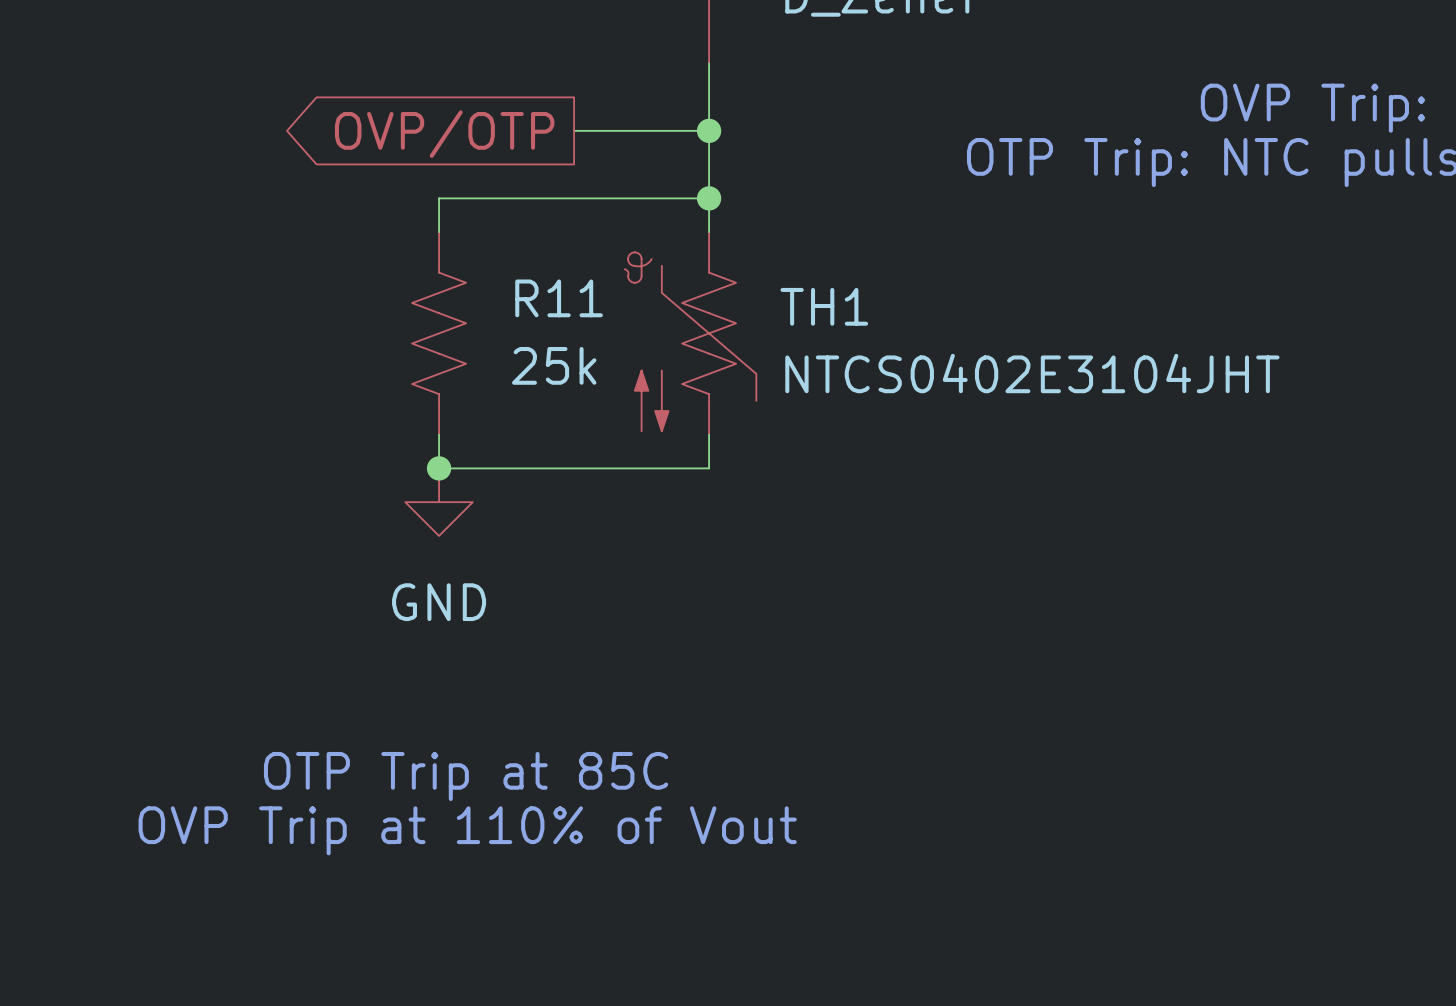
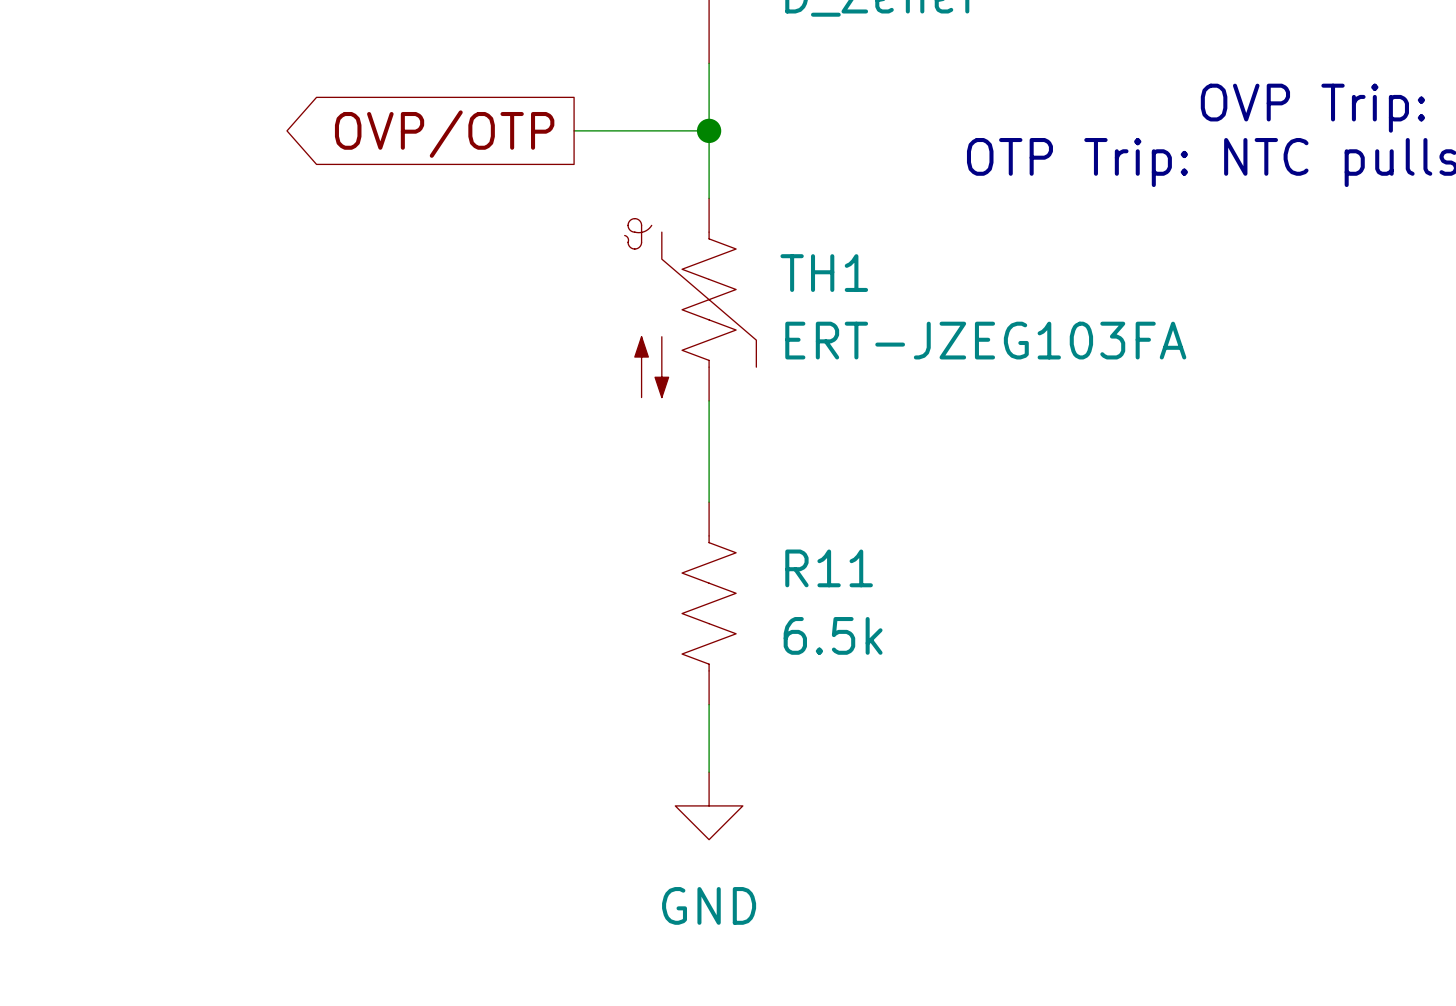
junction: (709, 198) -> none
wire: (439, 232) (439, 198) (709, 198) (709, 232) -> none
R11 position: (439, 333) -> (709, 603)
TH1 position: (690, 333) -> (690, 299)
R11 value: 25k (554, 365) -> 6.5k (833, 635)
TH1 value: NTCS0402E3104JHT (1032, 373) -> ERT-JZEG103FA (985, 340)
wire: (439, 434) (439, 468) (709, 468) -> (709, 502) (709, 468)
junction: (439, 468) -> none
power symbol position: GND (439, 502) -> GND (709, 805)
wire: none -> (709, 704) (709, 772)
text: OTP Trip at 85C (466, 776) -> none
text: OVP Trip at 110% of Vout (467, 830) -> none

